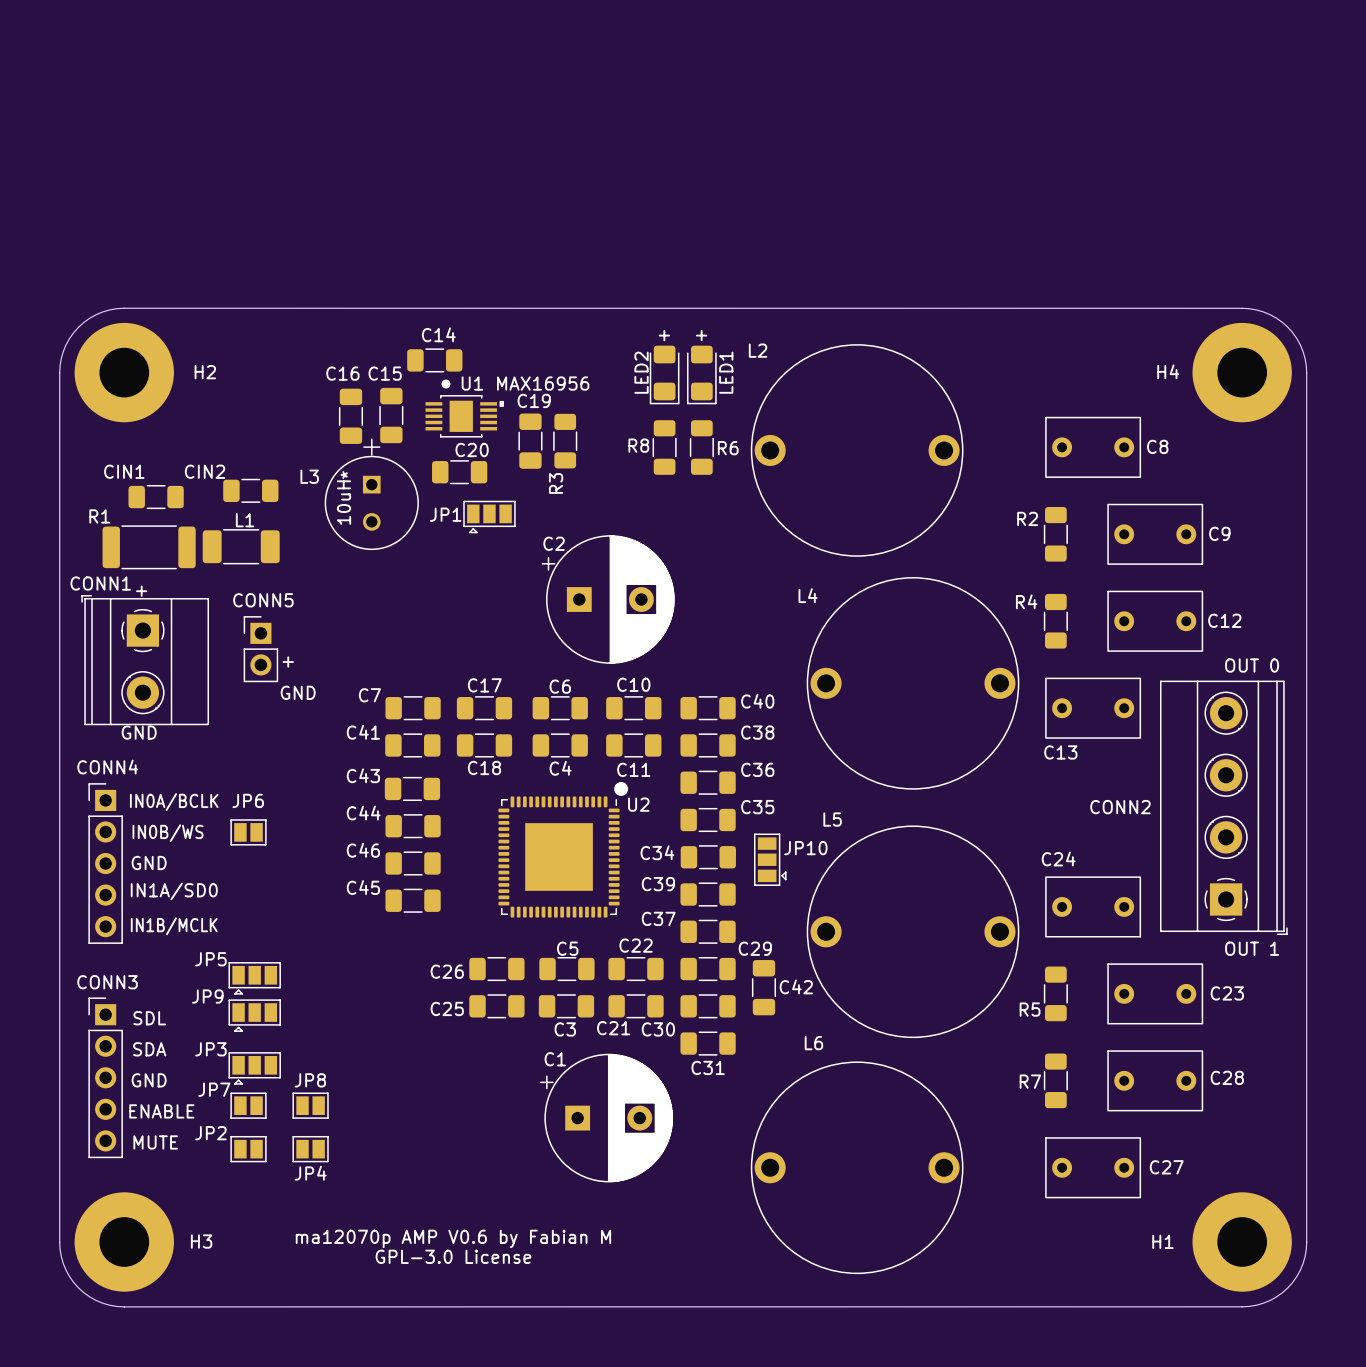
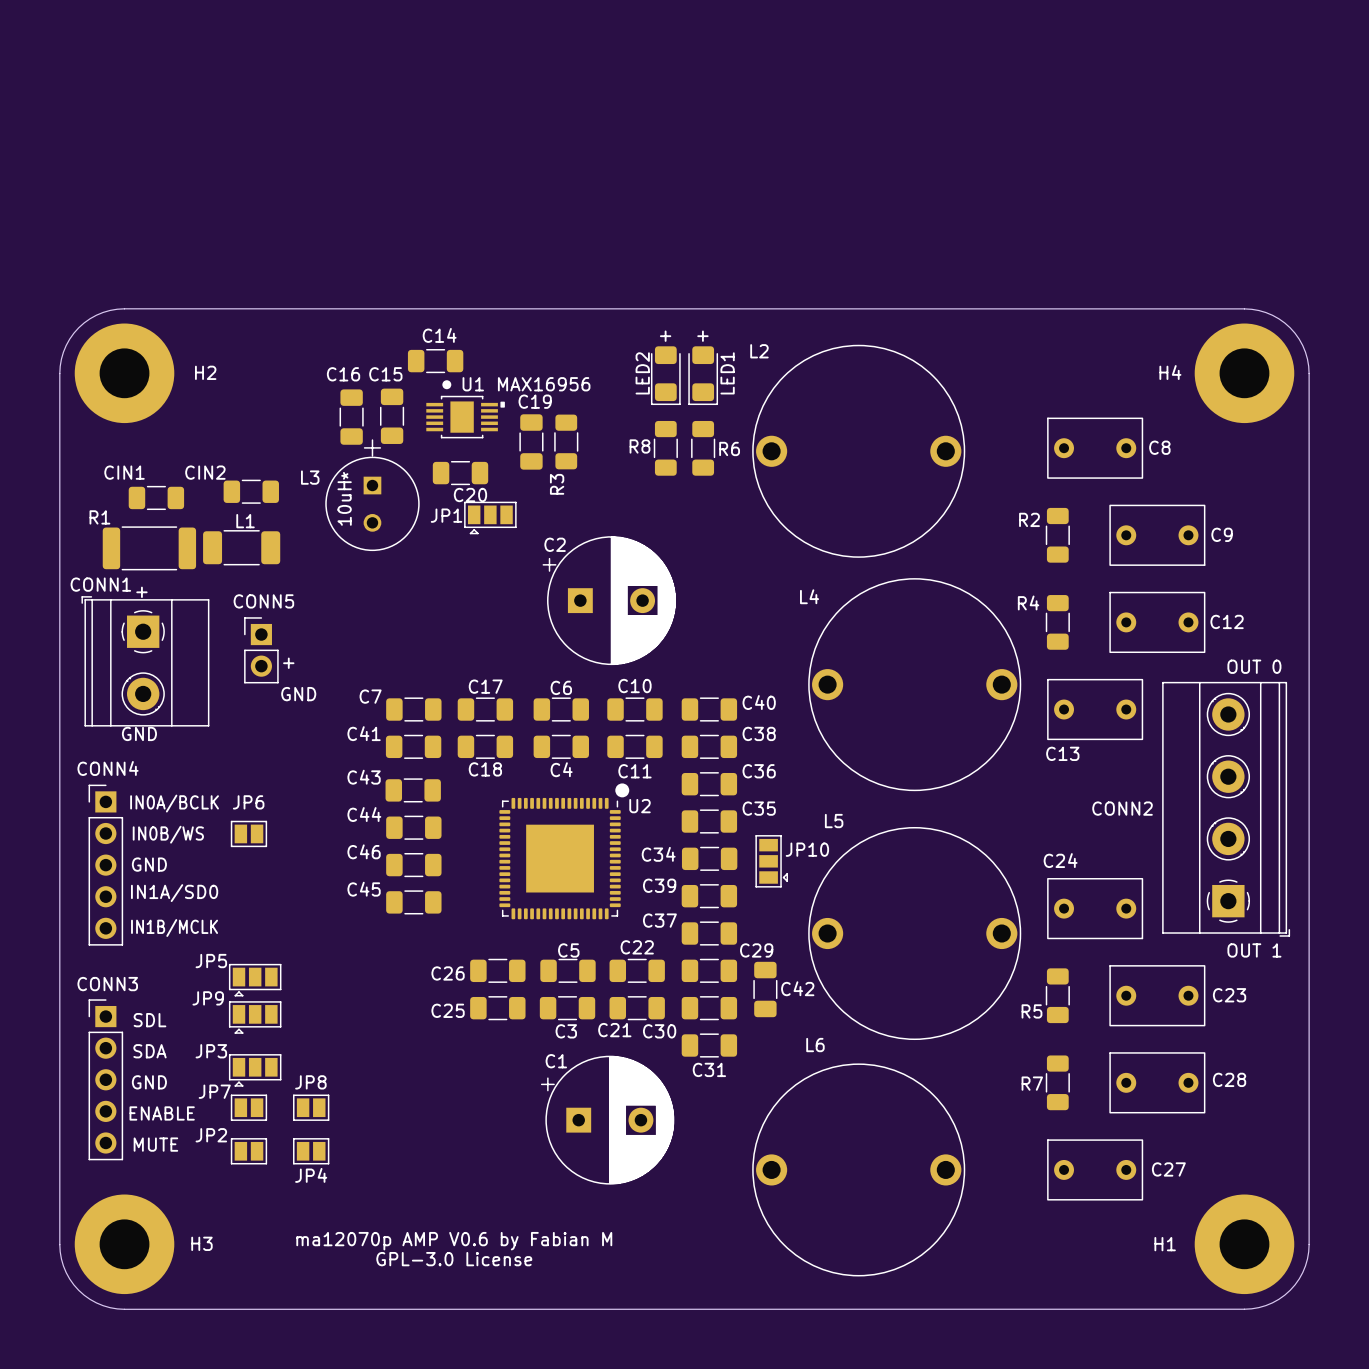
C20 name position: C20 (472, 450) -> C20 (470, 495)

